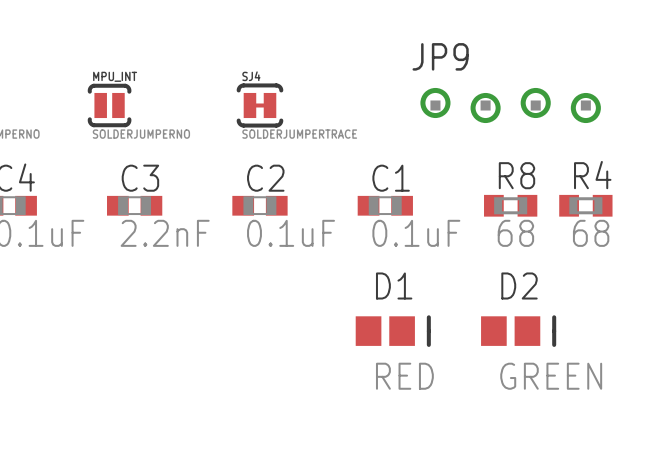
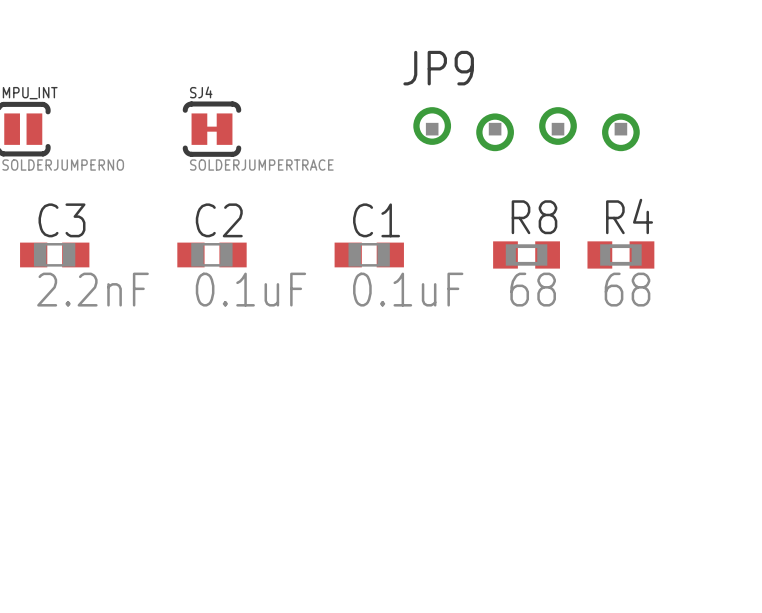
D1: RED (393, 331) -> none
D2: GREEN (518, 331) -> none

